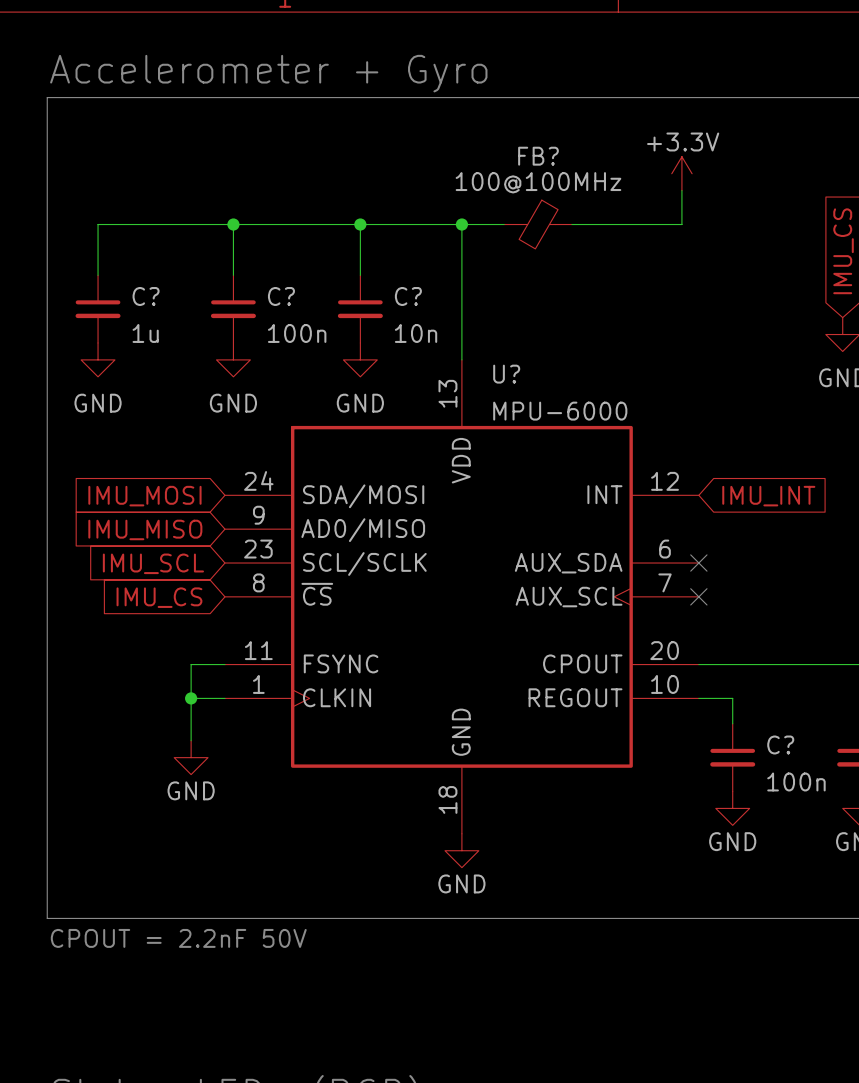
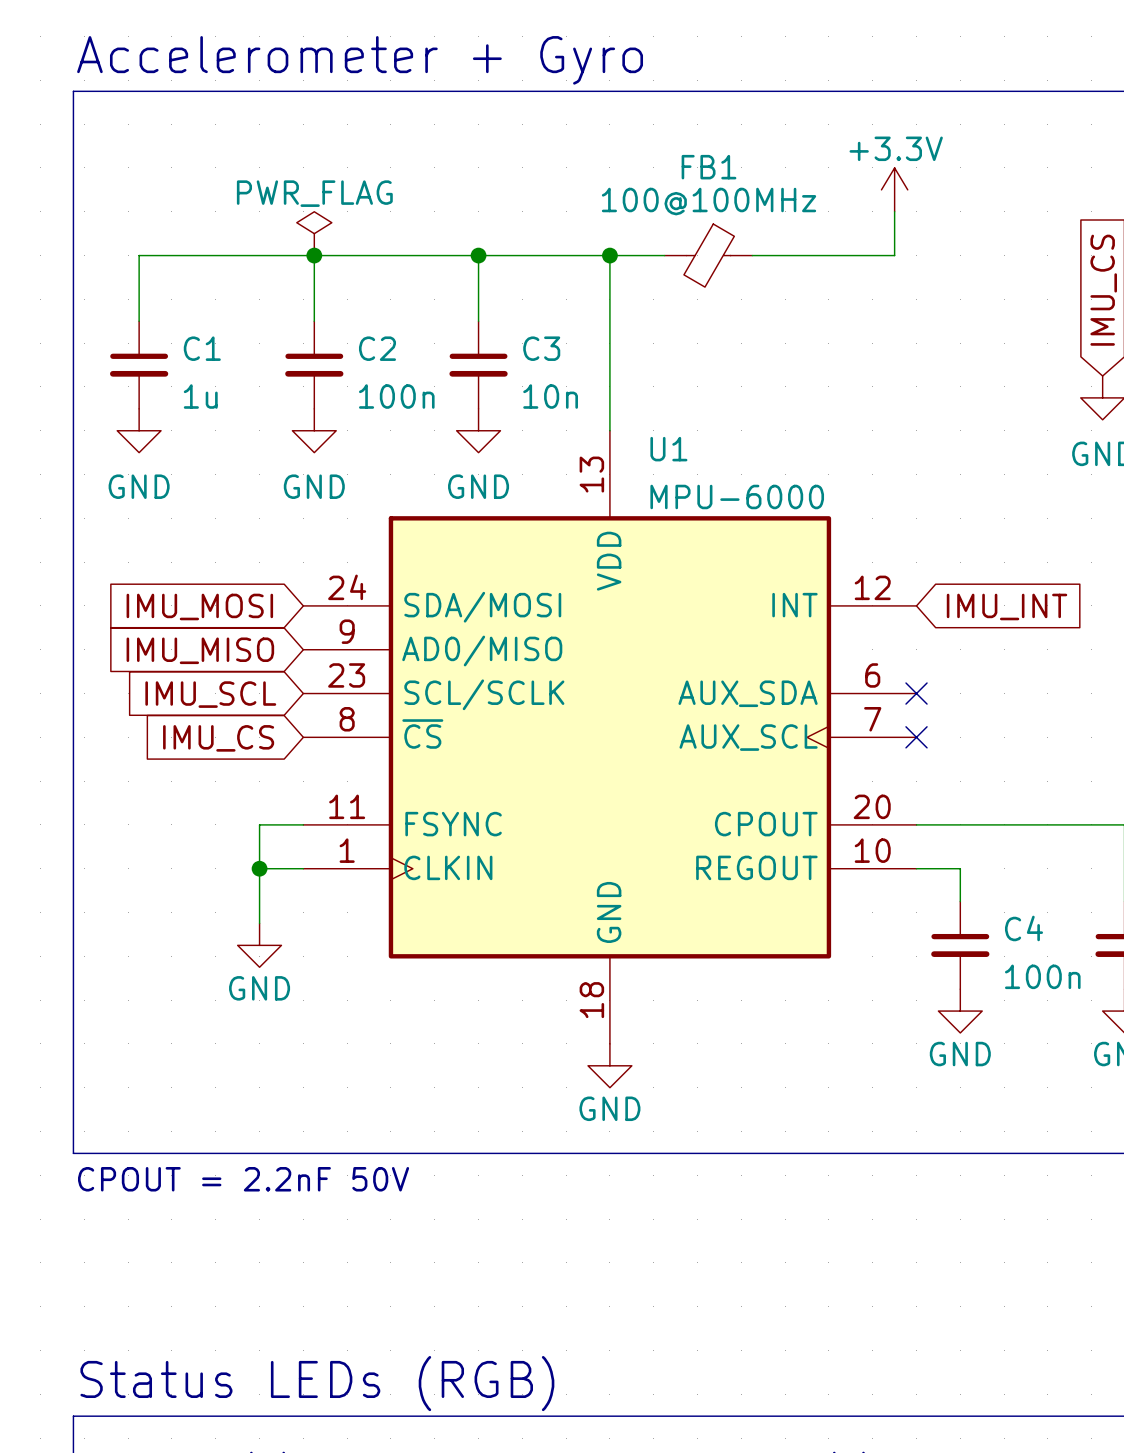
FB? name: FB? (538, 156) -> FB1 (709, 167)
power symbol: none -> PWR_FLAG (314, 233)
C? name: C? (146, 296) -> C1 (202, 348)
C? name: C? (281, 296) -> C2 (377, 348)
C? name: C? (408, 296) -> C3 (541, 348)
U? name: U? (506, 374) -> U1 (668, 449)
C? name: C? (780, 744) -> C4 (1024, 928)

